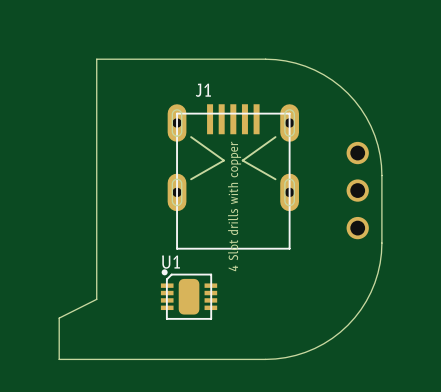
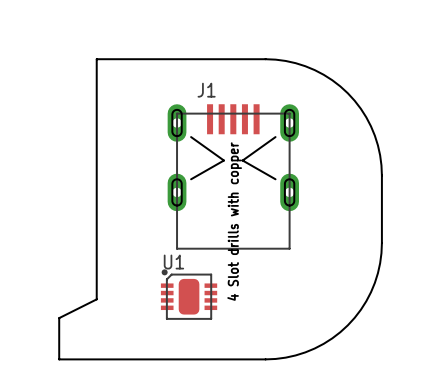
part: (357, 190) -> none

